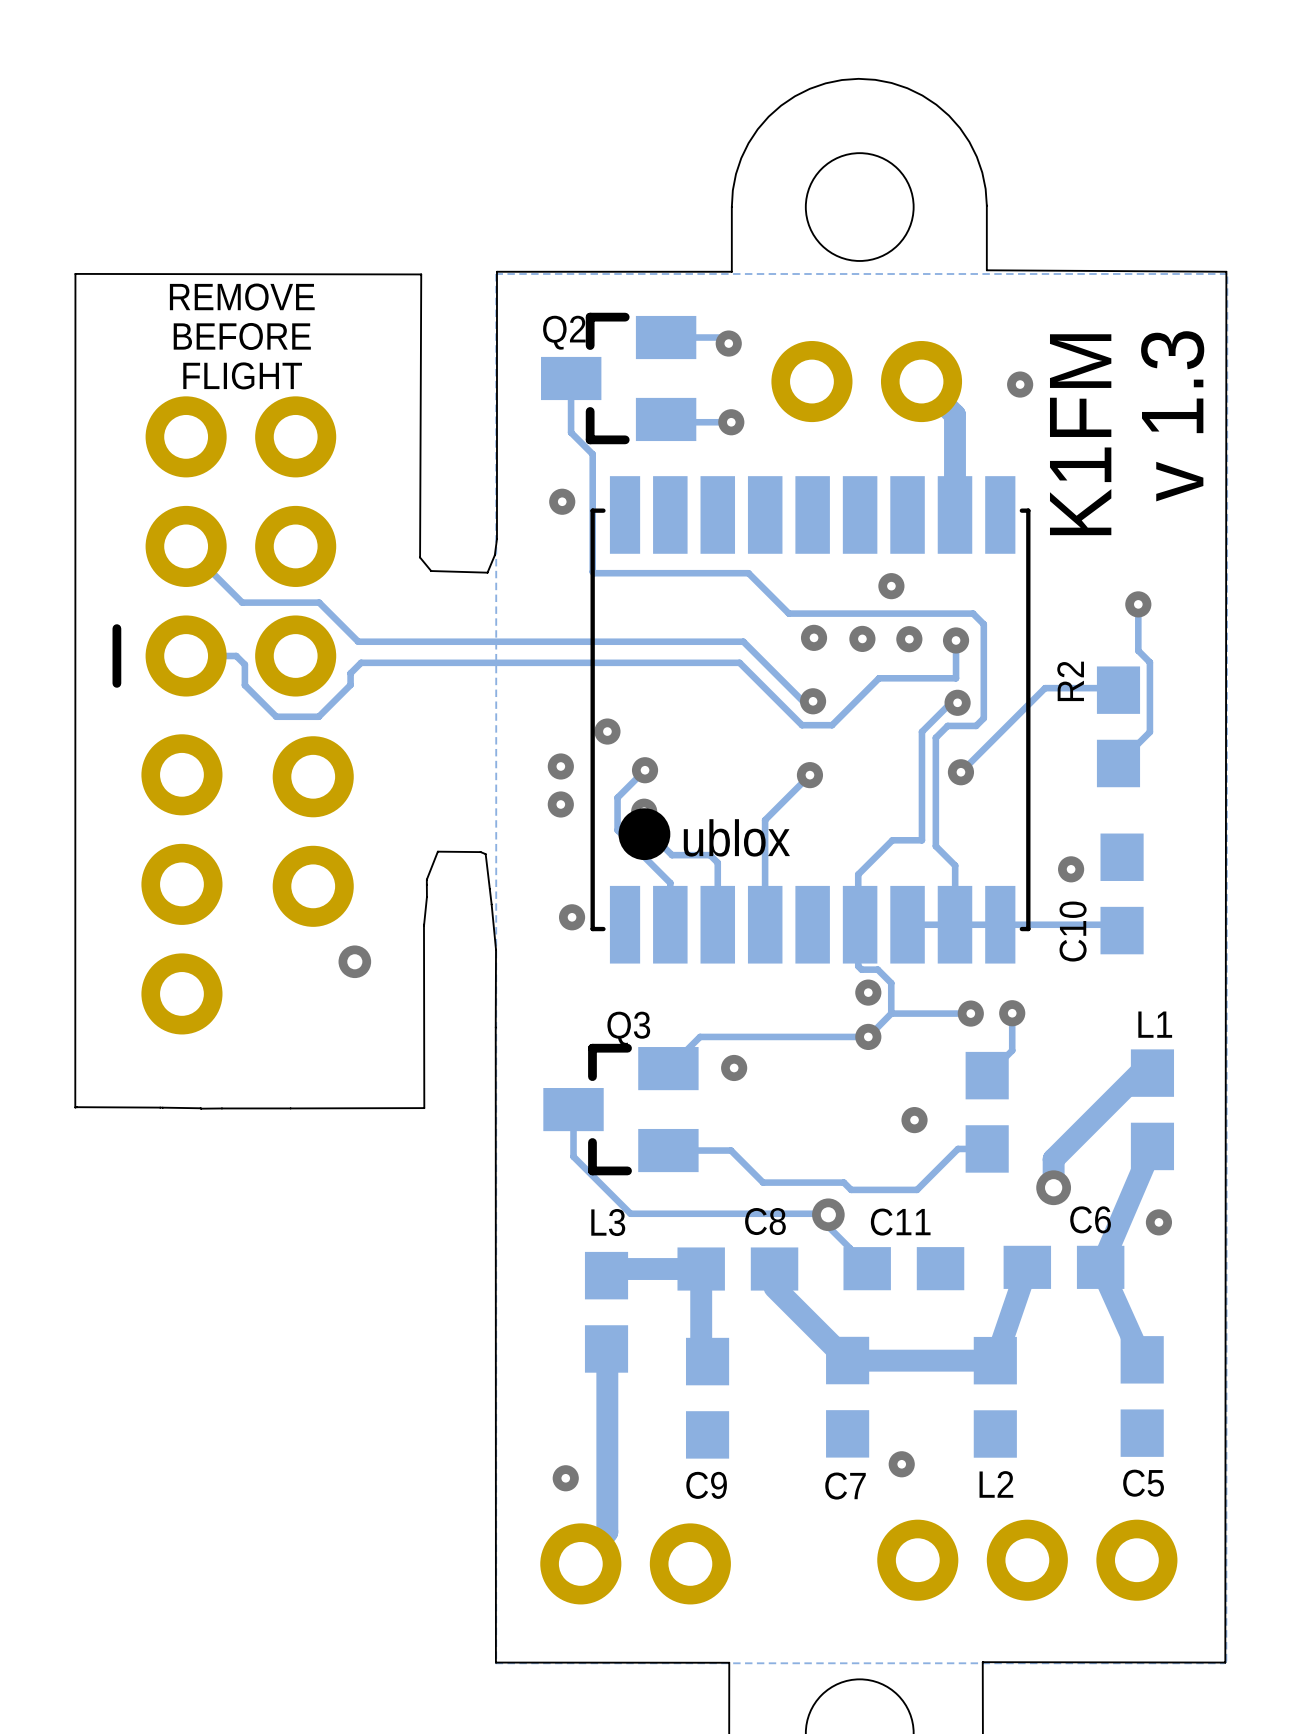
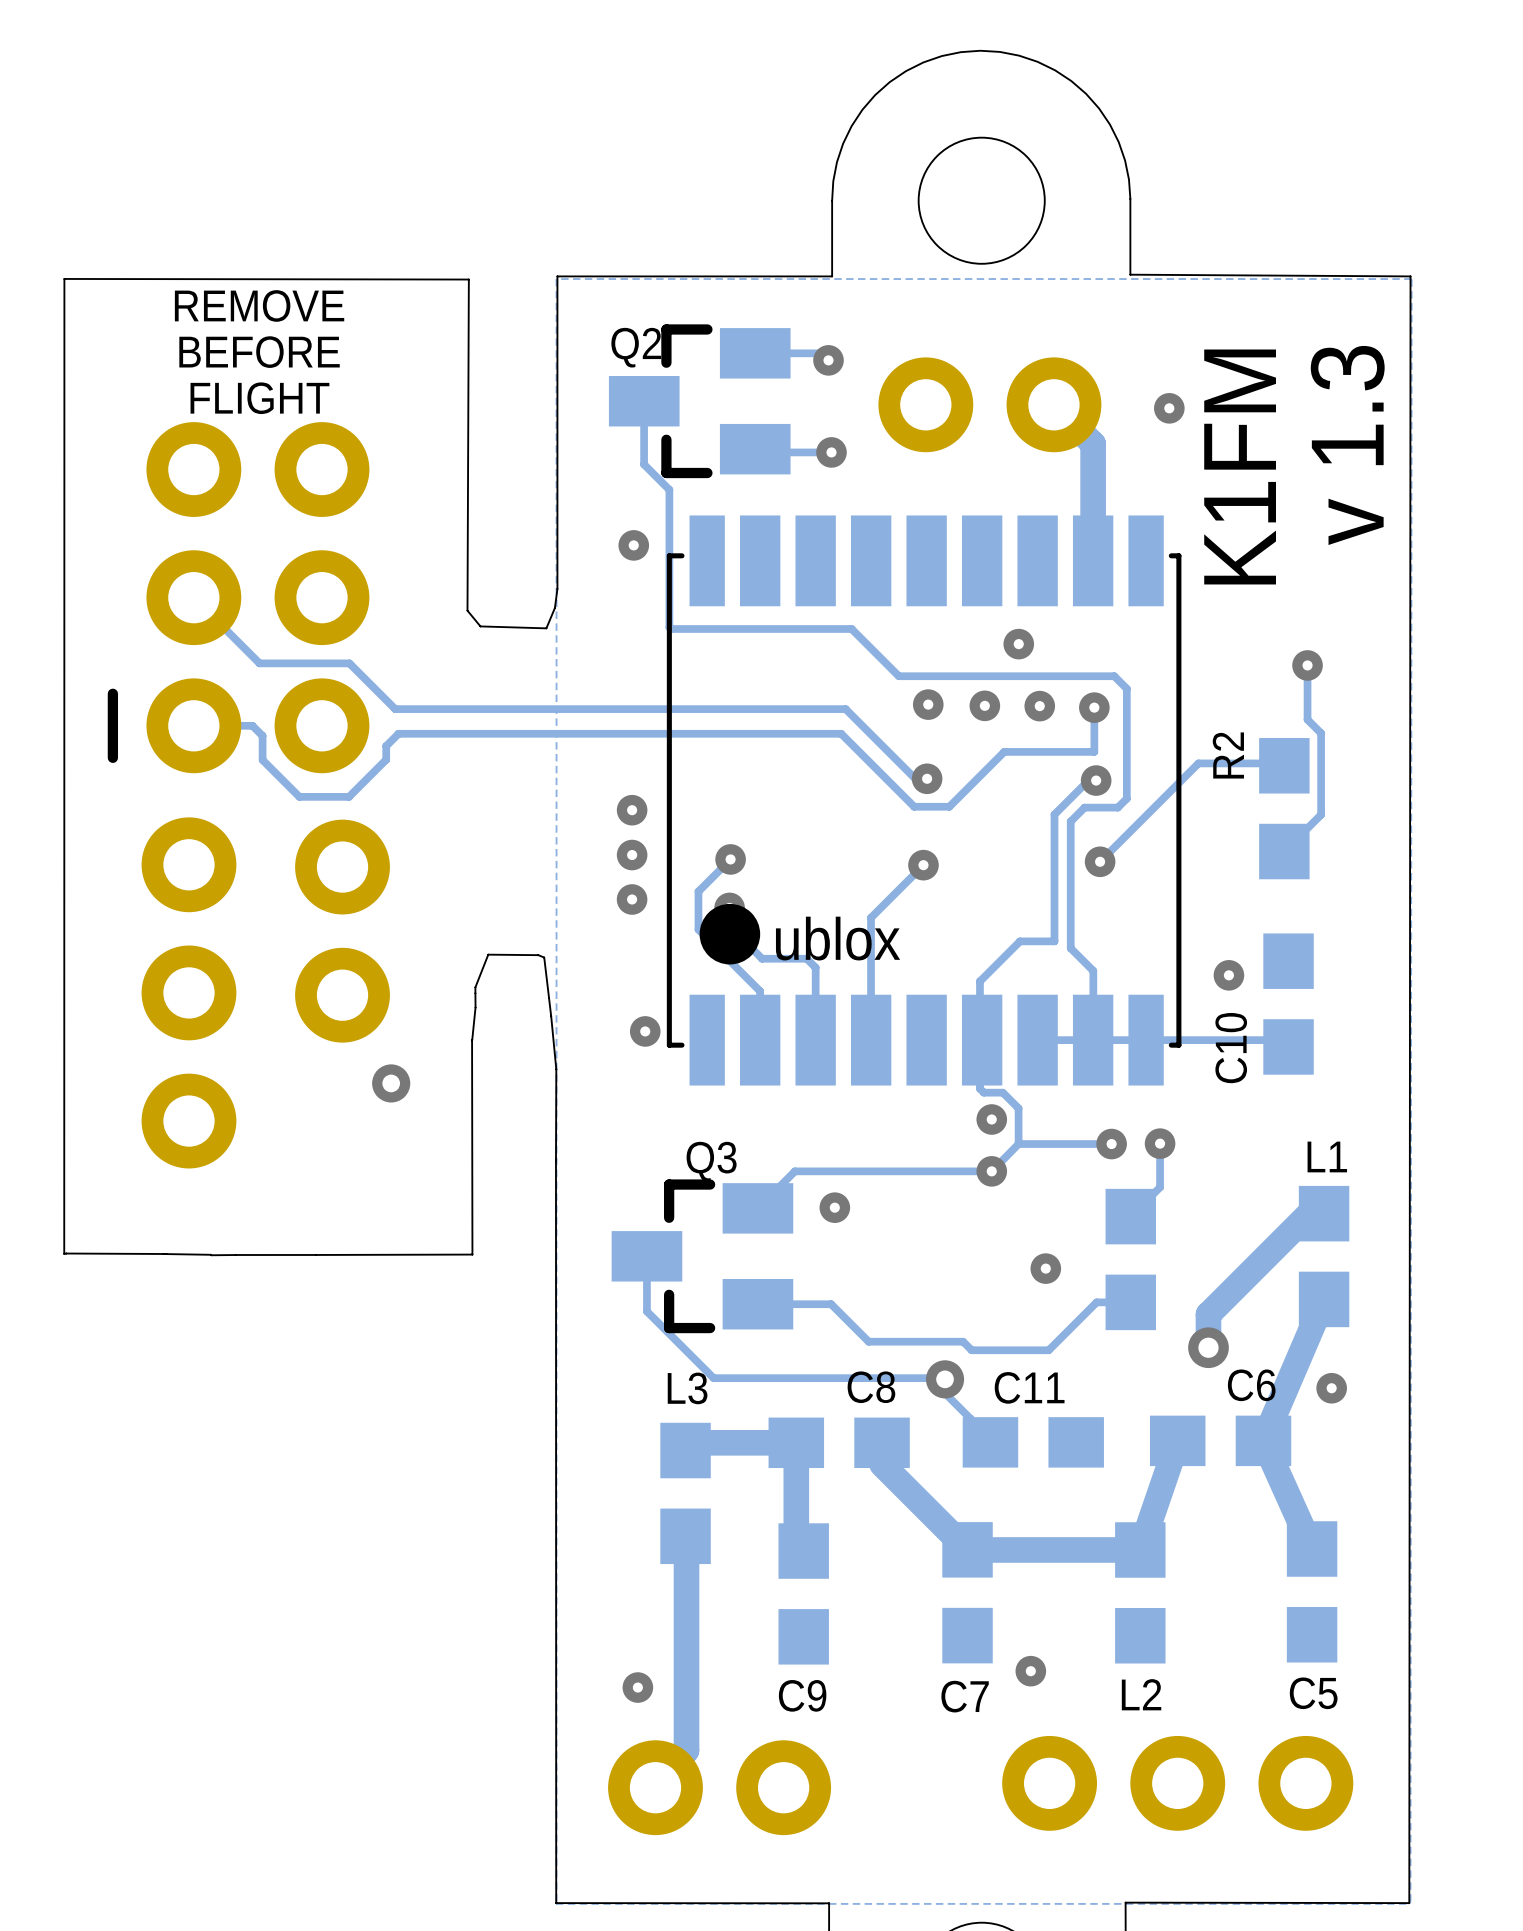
via position: (607, 731) -> (632, 810)

